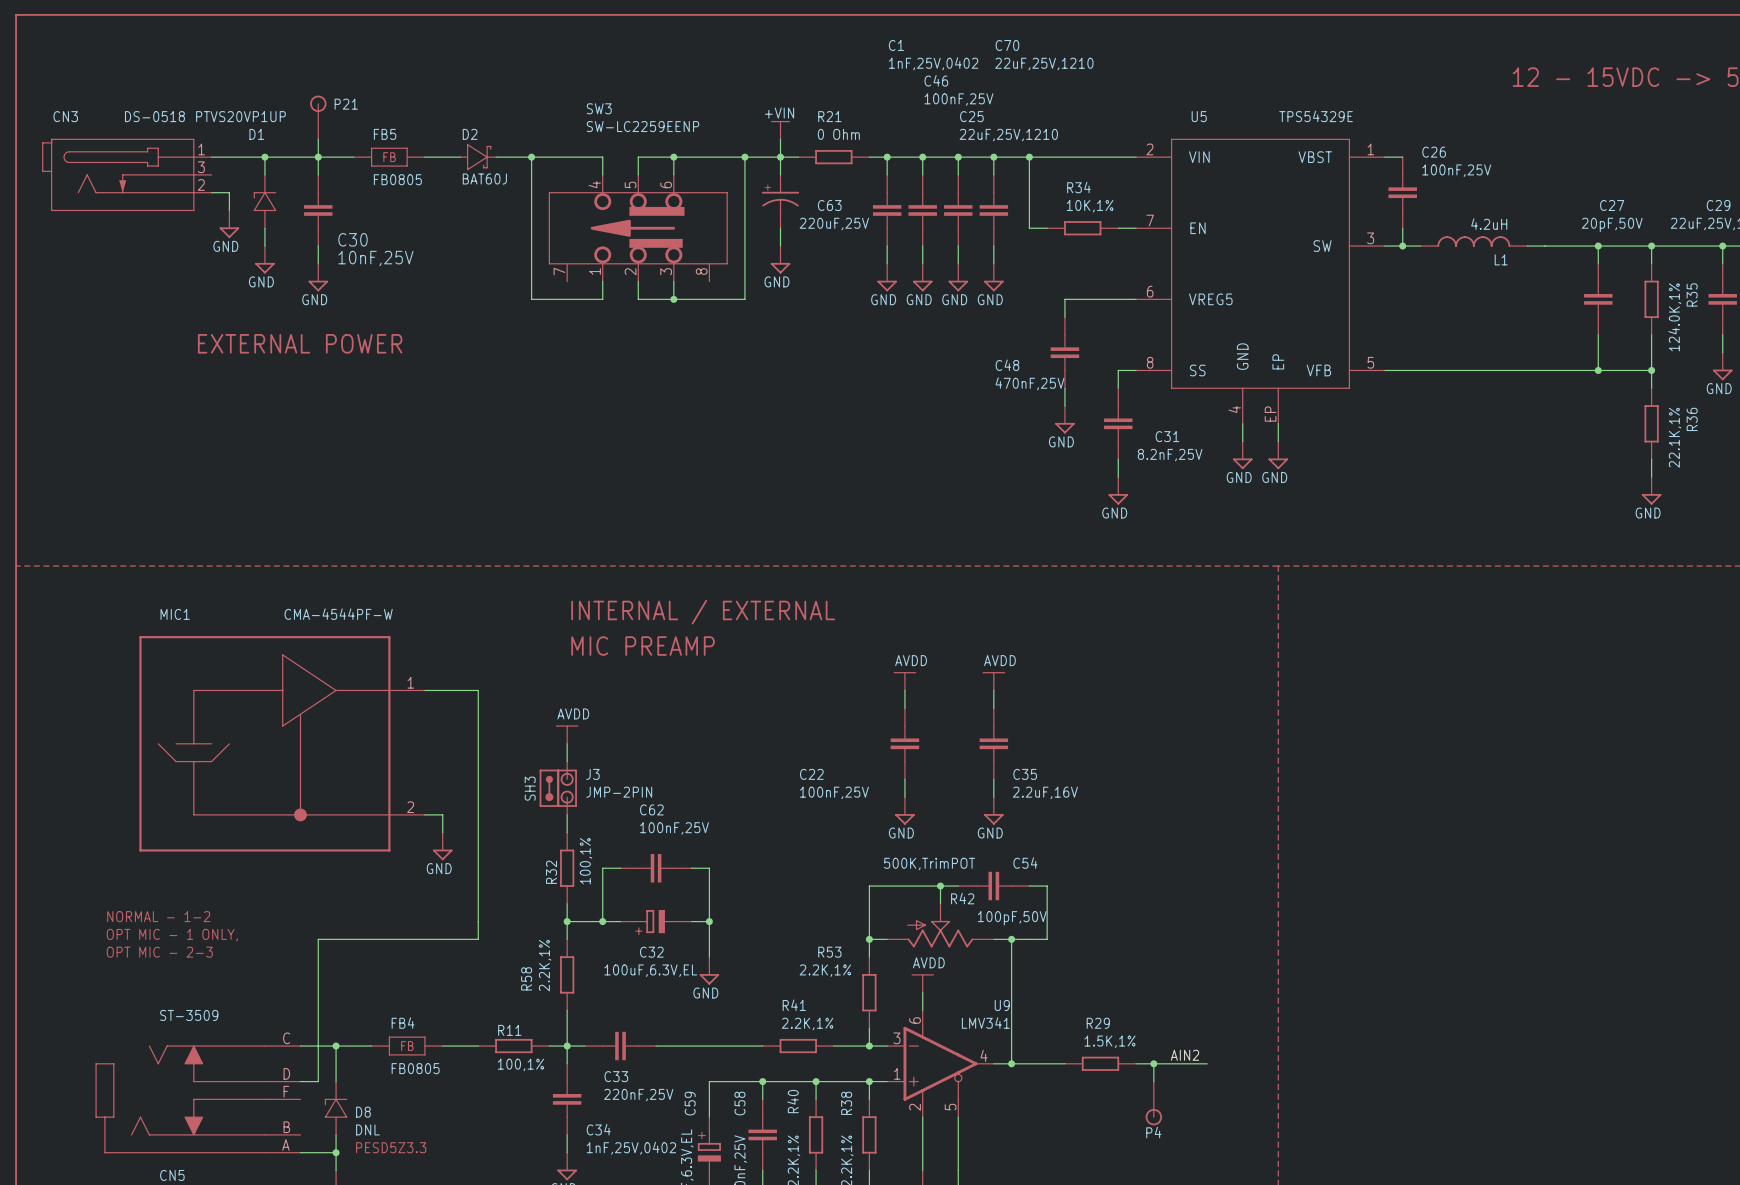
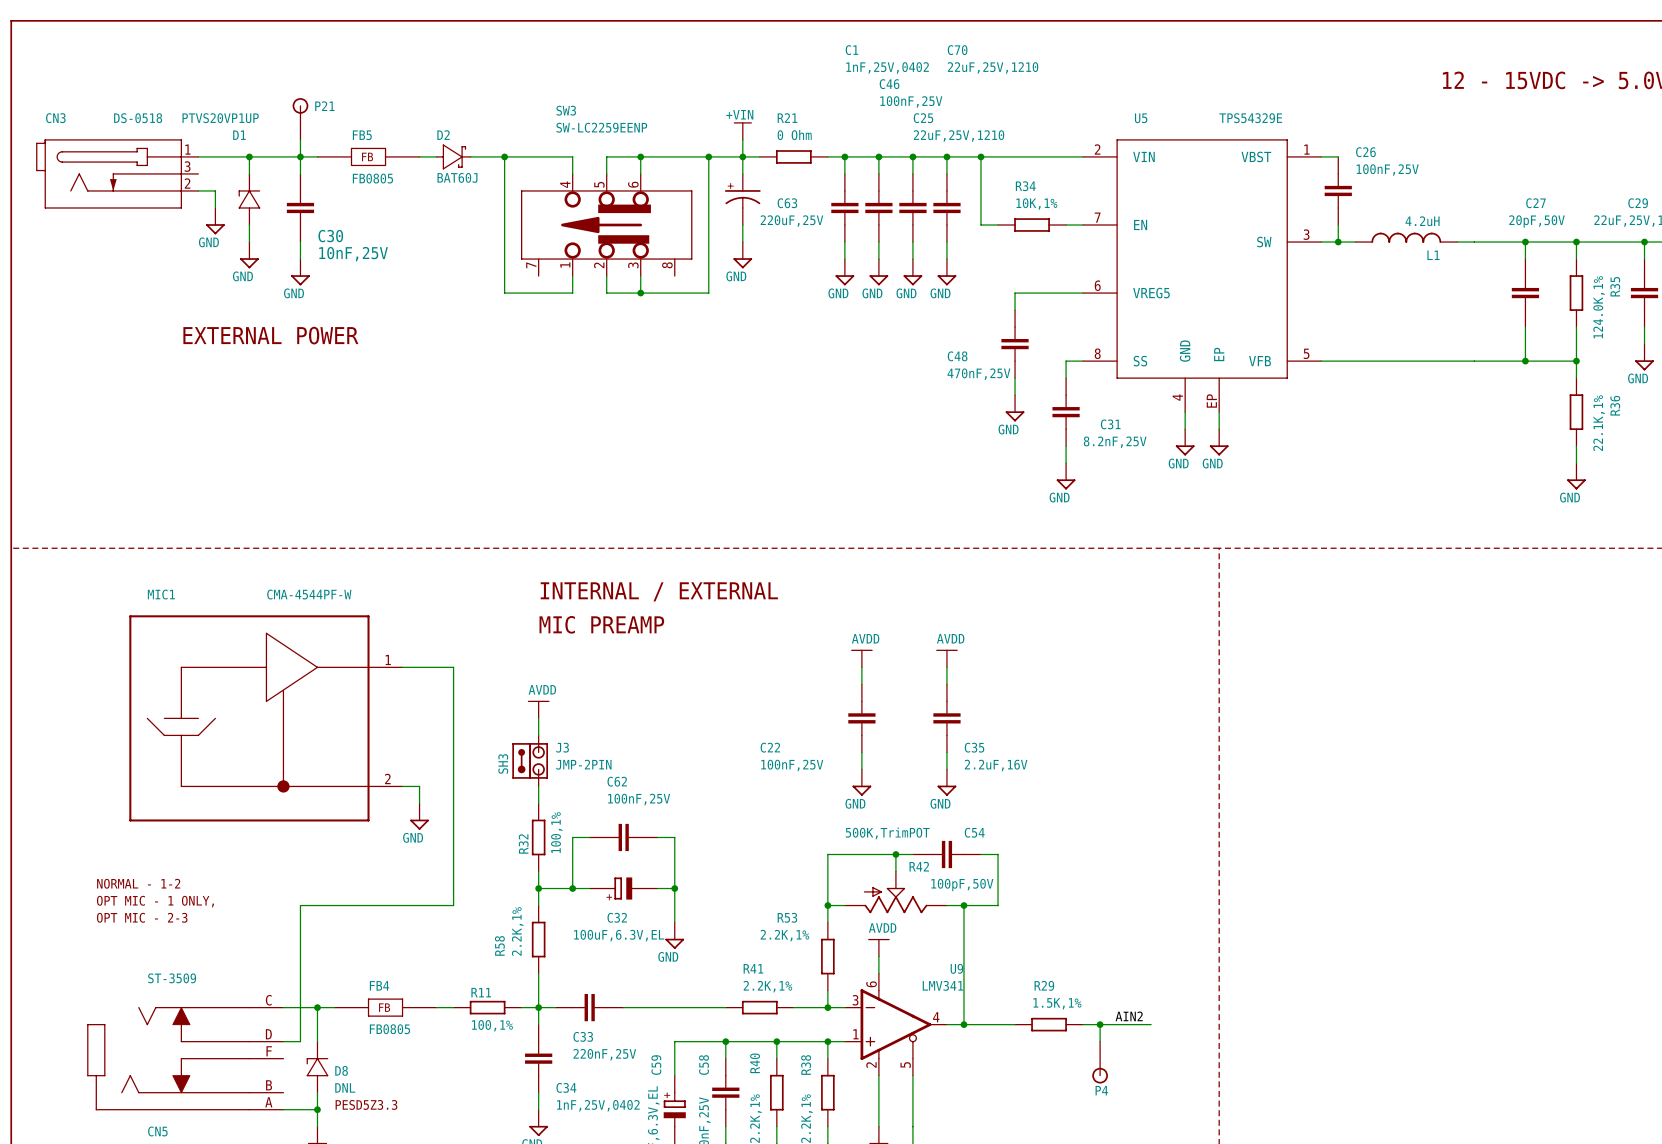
FB5 symbol: [353, 147, 425, 167] -> [317, 147, 420, 166]
FB4 symbol: [371, 1036, 443, 1056] -> [334, 998, 437, 1017]

